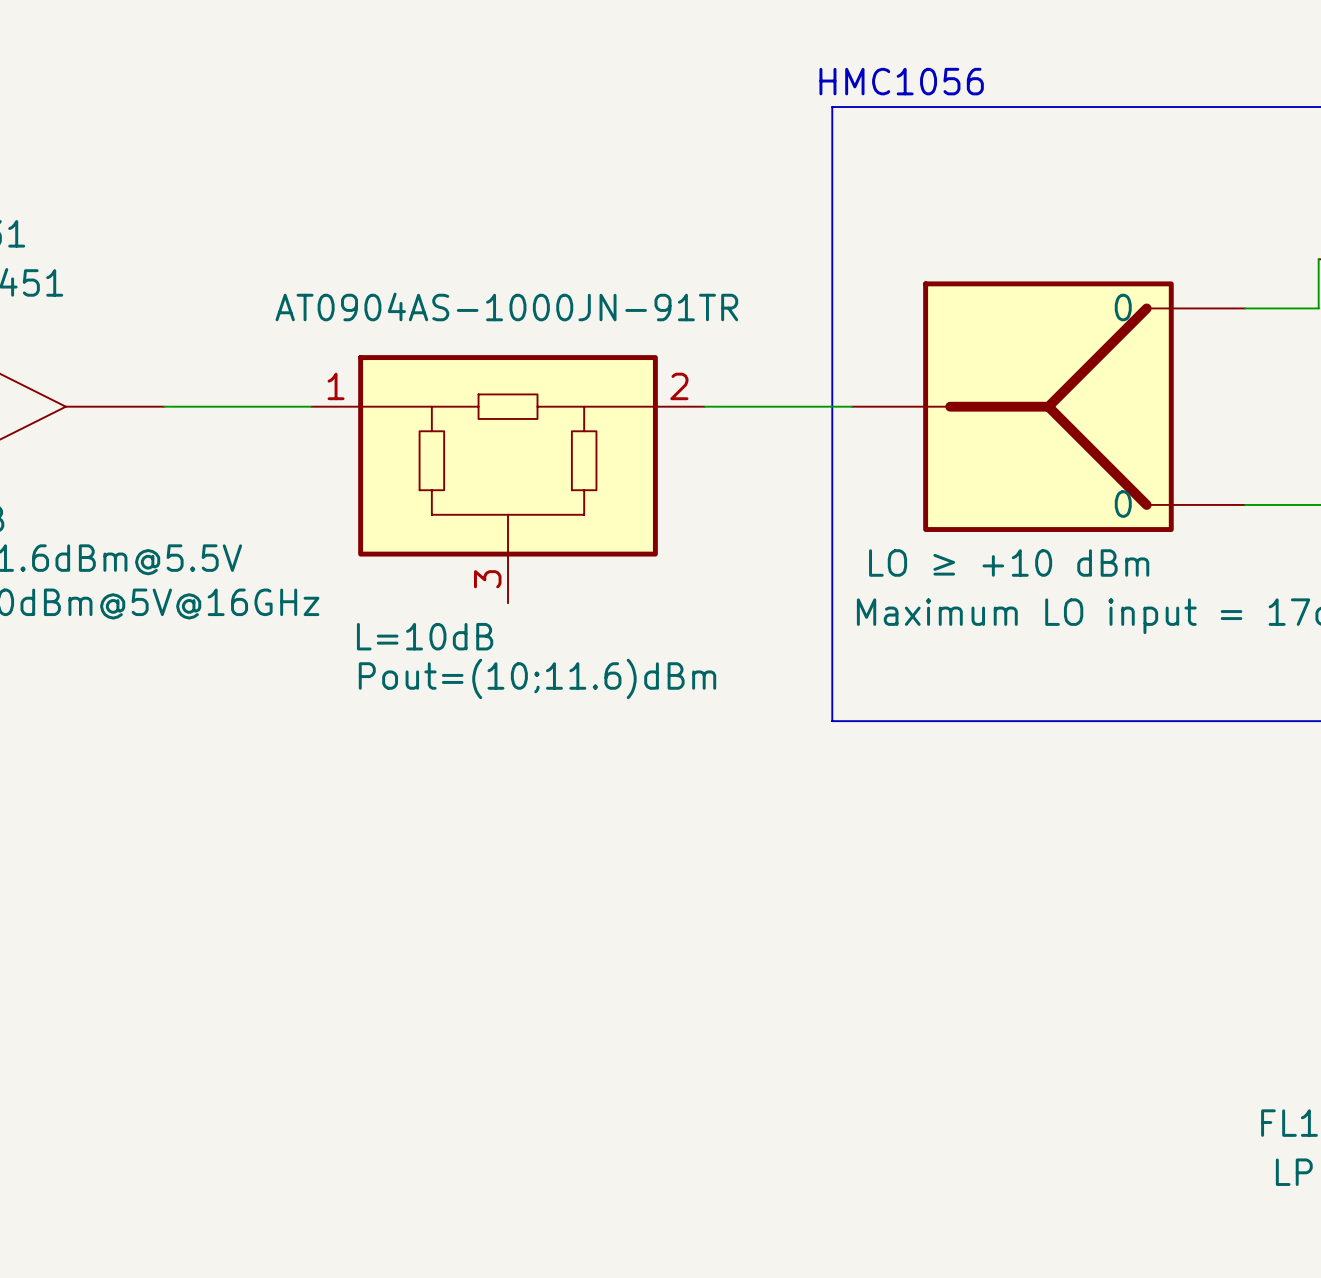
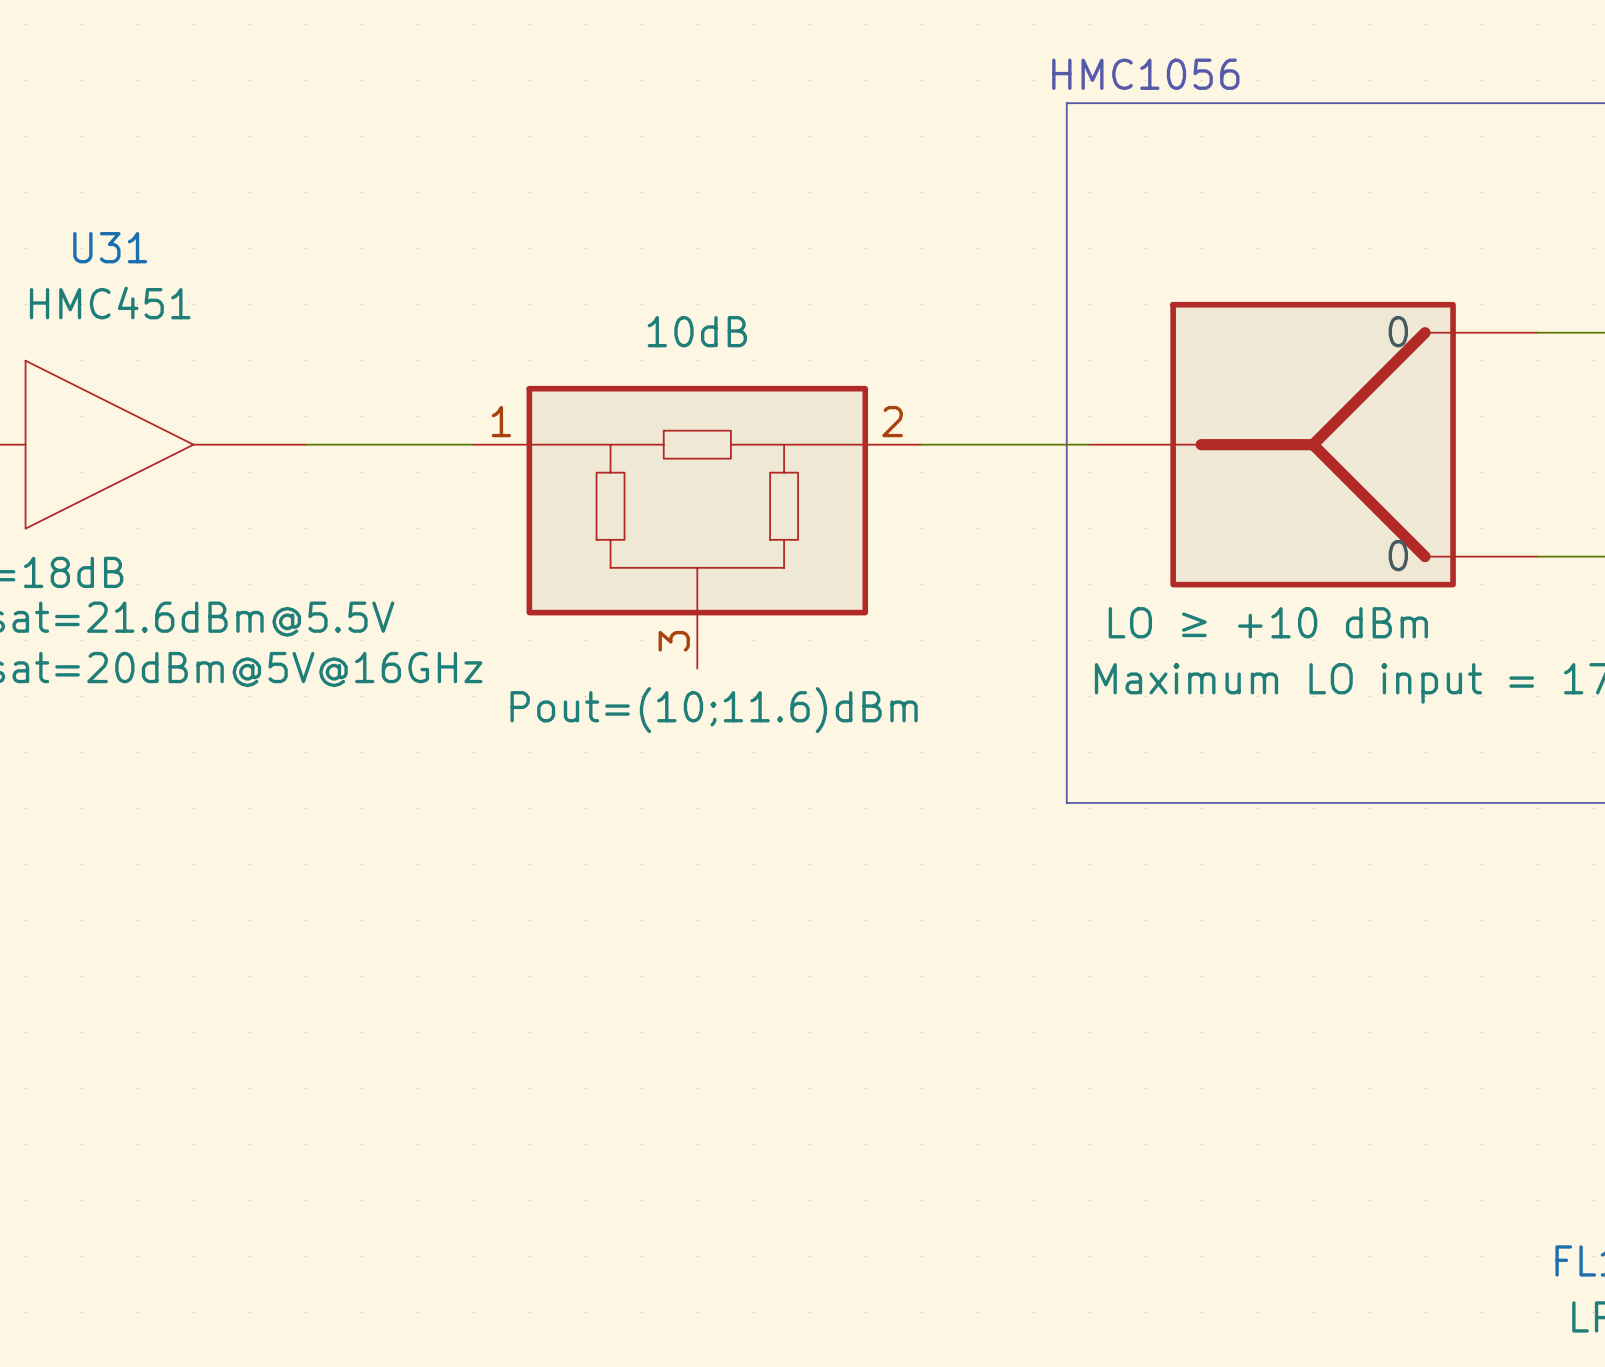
part value: AT0904AS-1000JN-91TR (506, 306) -> 10dB (697, 331)
part text: L=10dB (425, 636) -> none
part text position: Pout=(10;11.6)dBm (537, 678) -> Pout=(10;11.6)dBm (714, 710)

